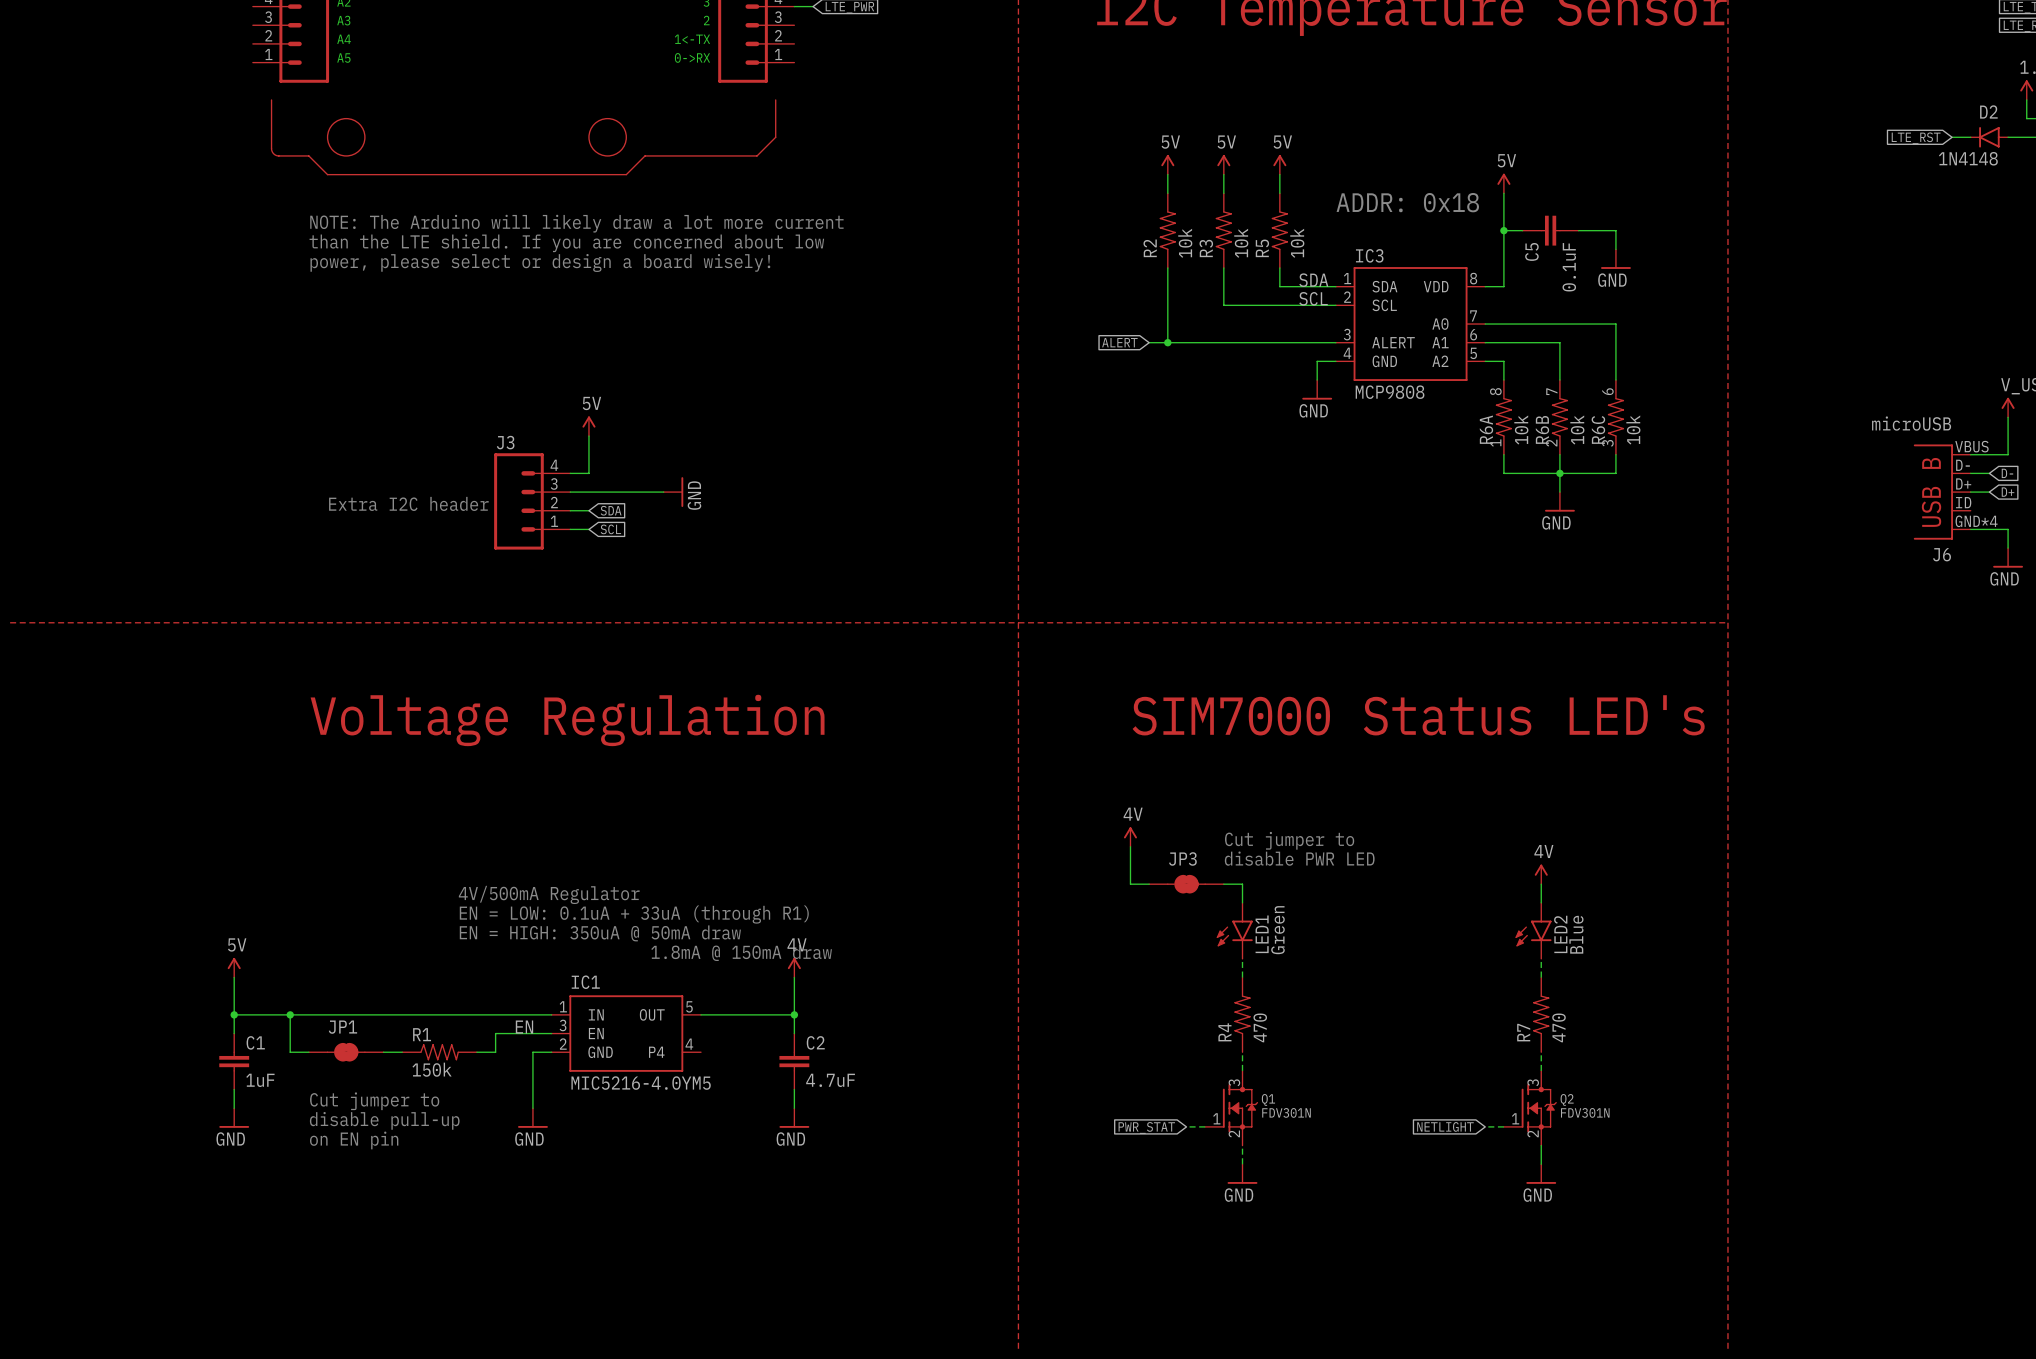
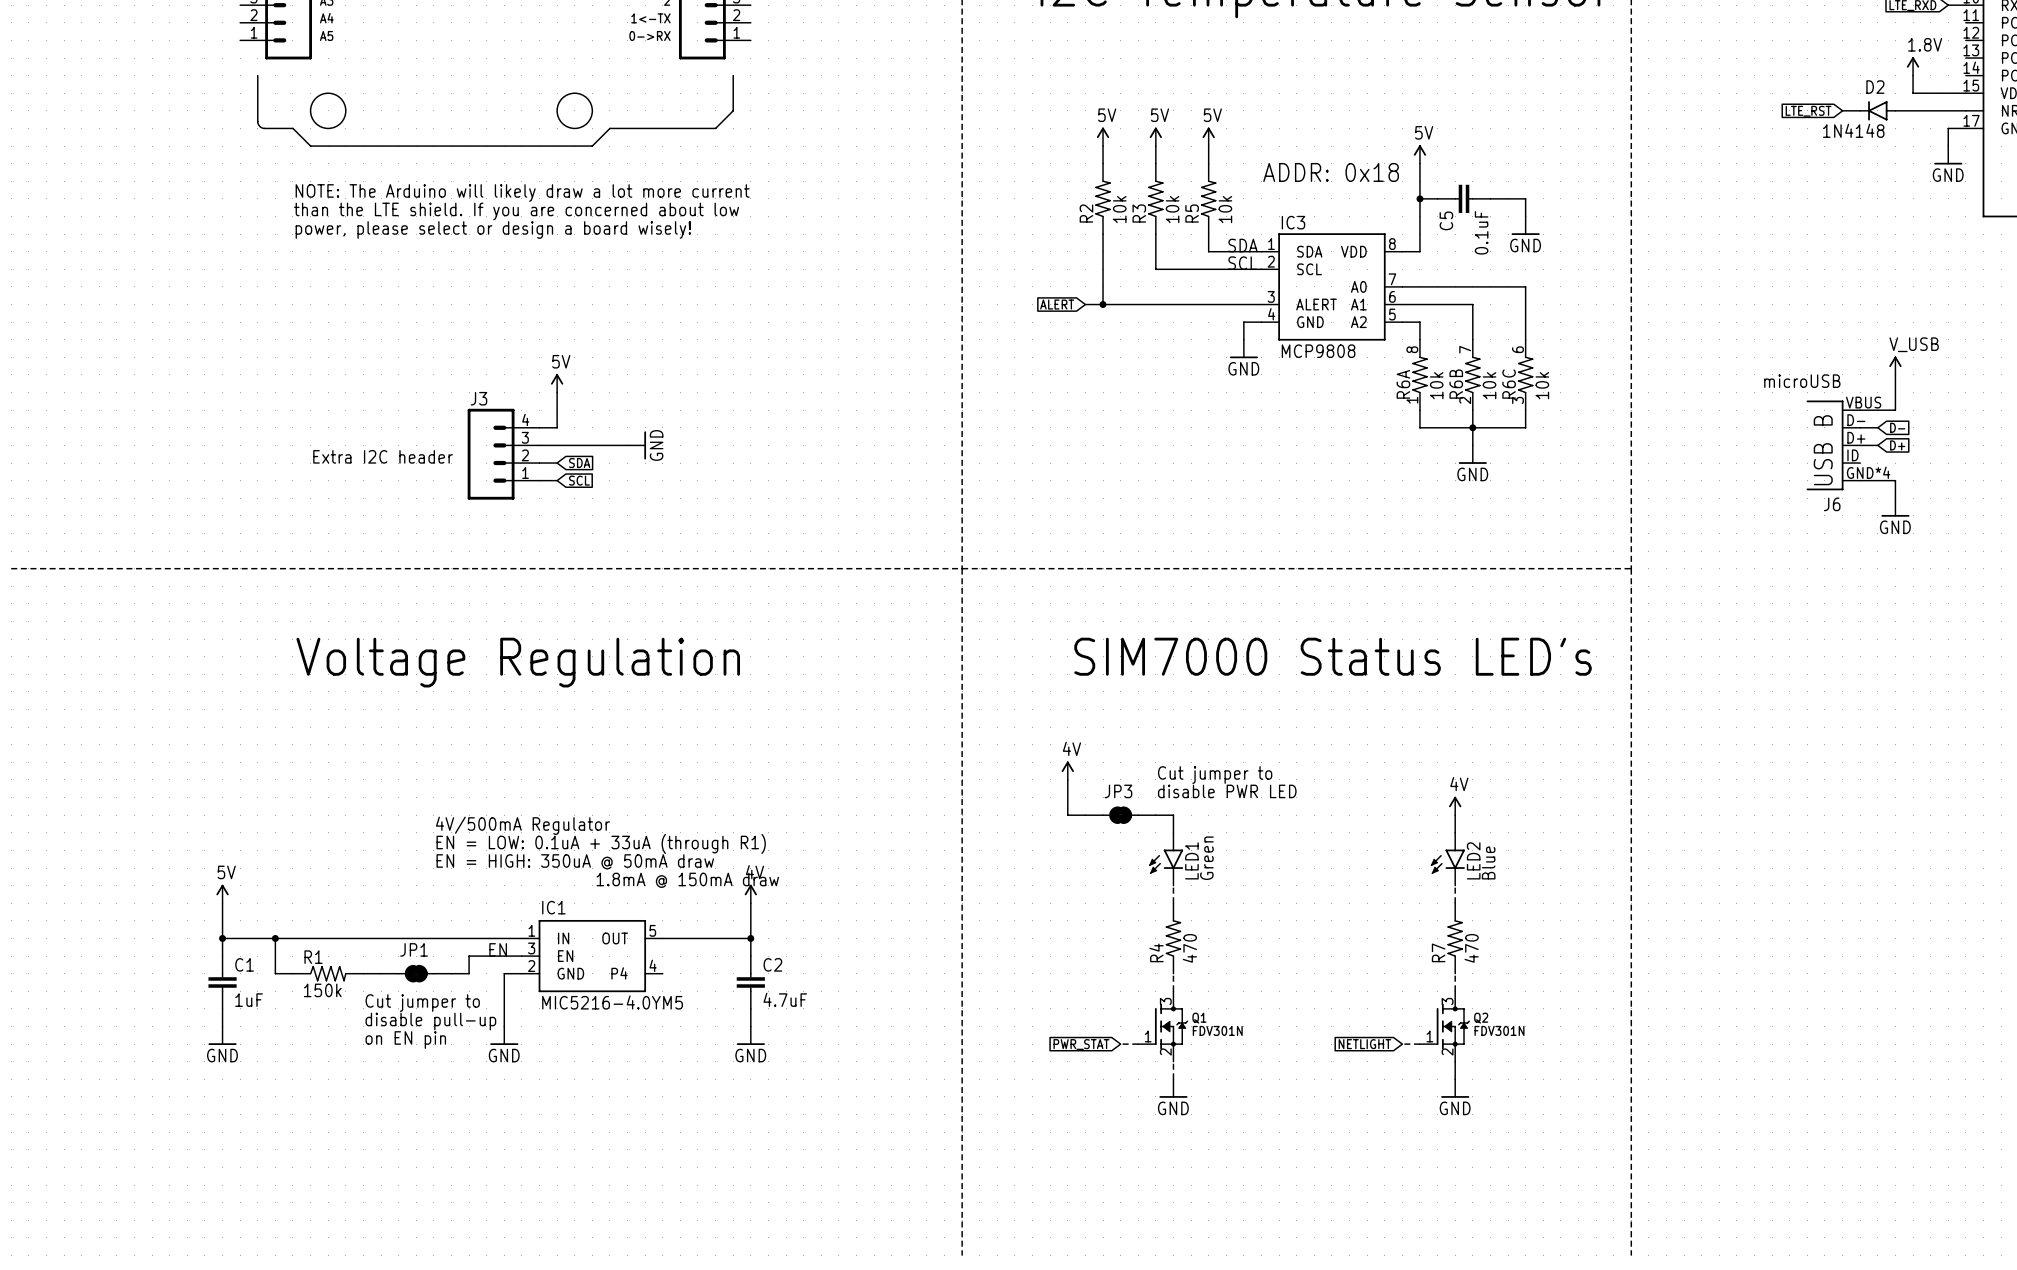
JP1 position: (346, 1052) -> (416, 973)
R1 position: (439, 1052) -> (328, 973)
text position: Cut jumper to (374, 1101) -> Cut jumper to (422, 1003)
text position: disable pull-up (384, 1120) -> disable pull-up (430, 1021)
text position: on EN pin (354, 1140) -> on EN pin (405, 1040)

